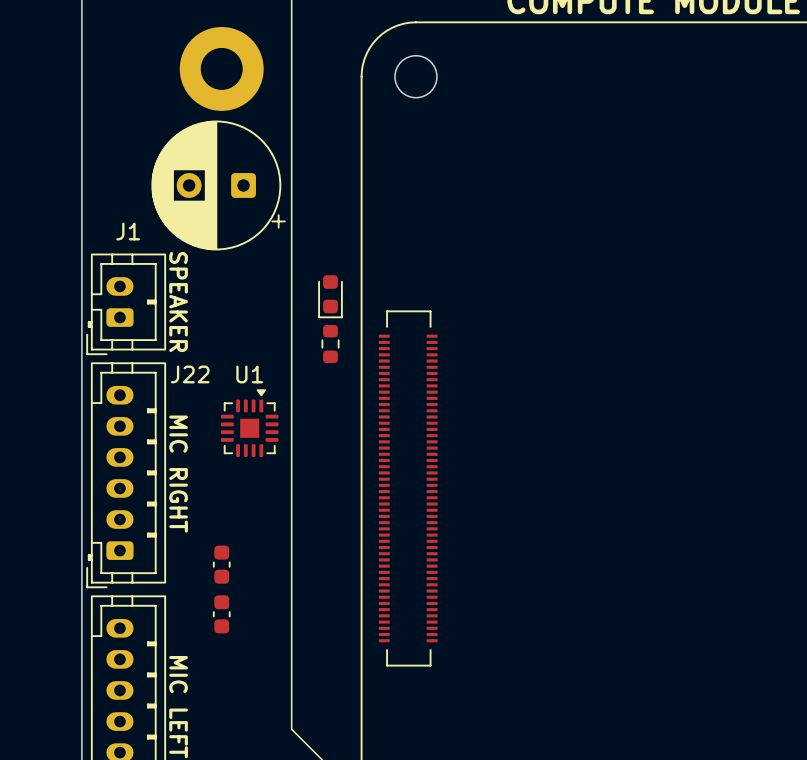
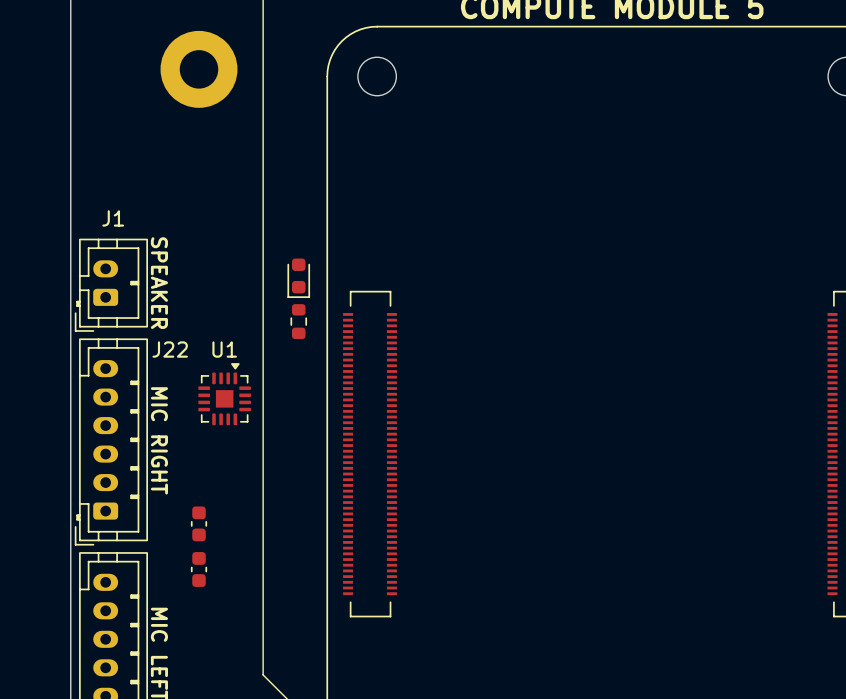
part: (218, 185) -> none

